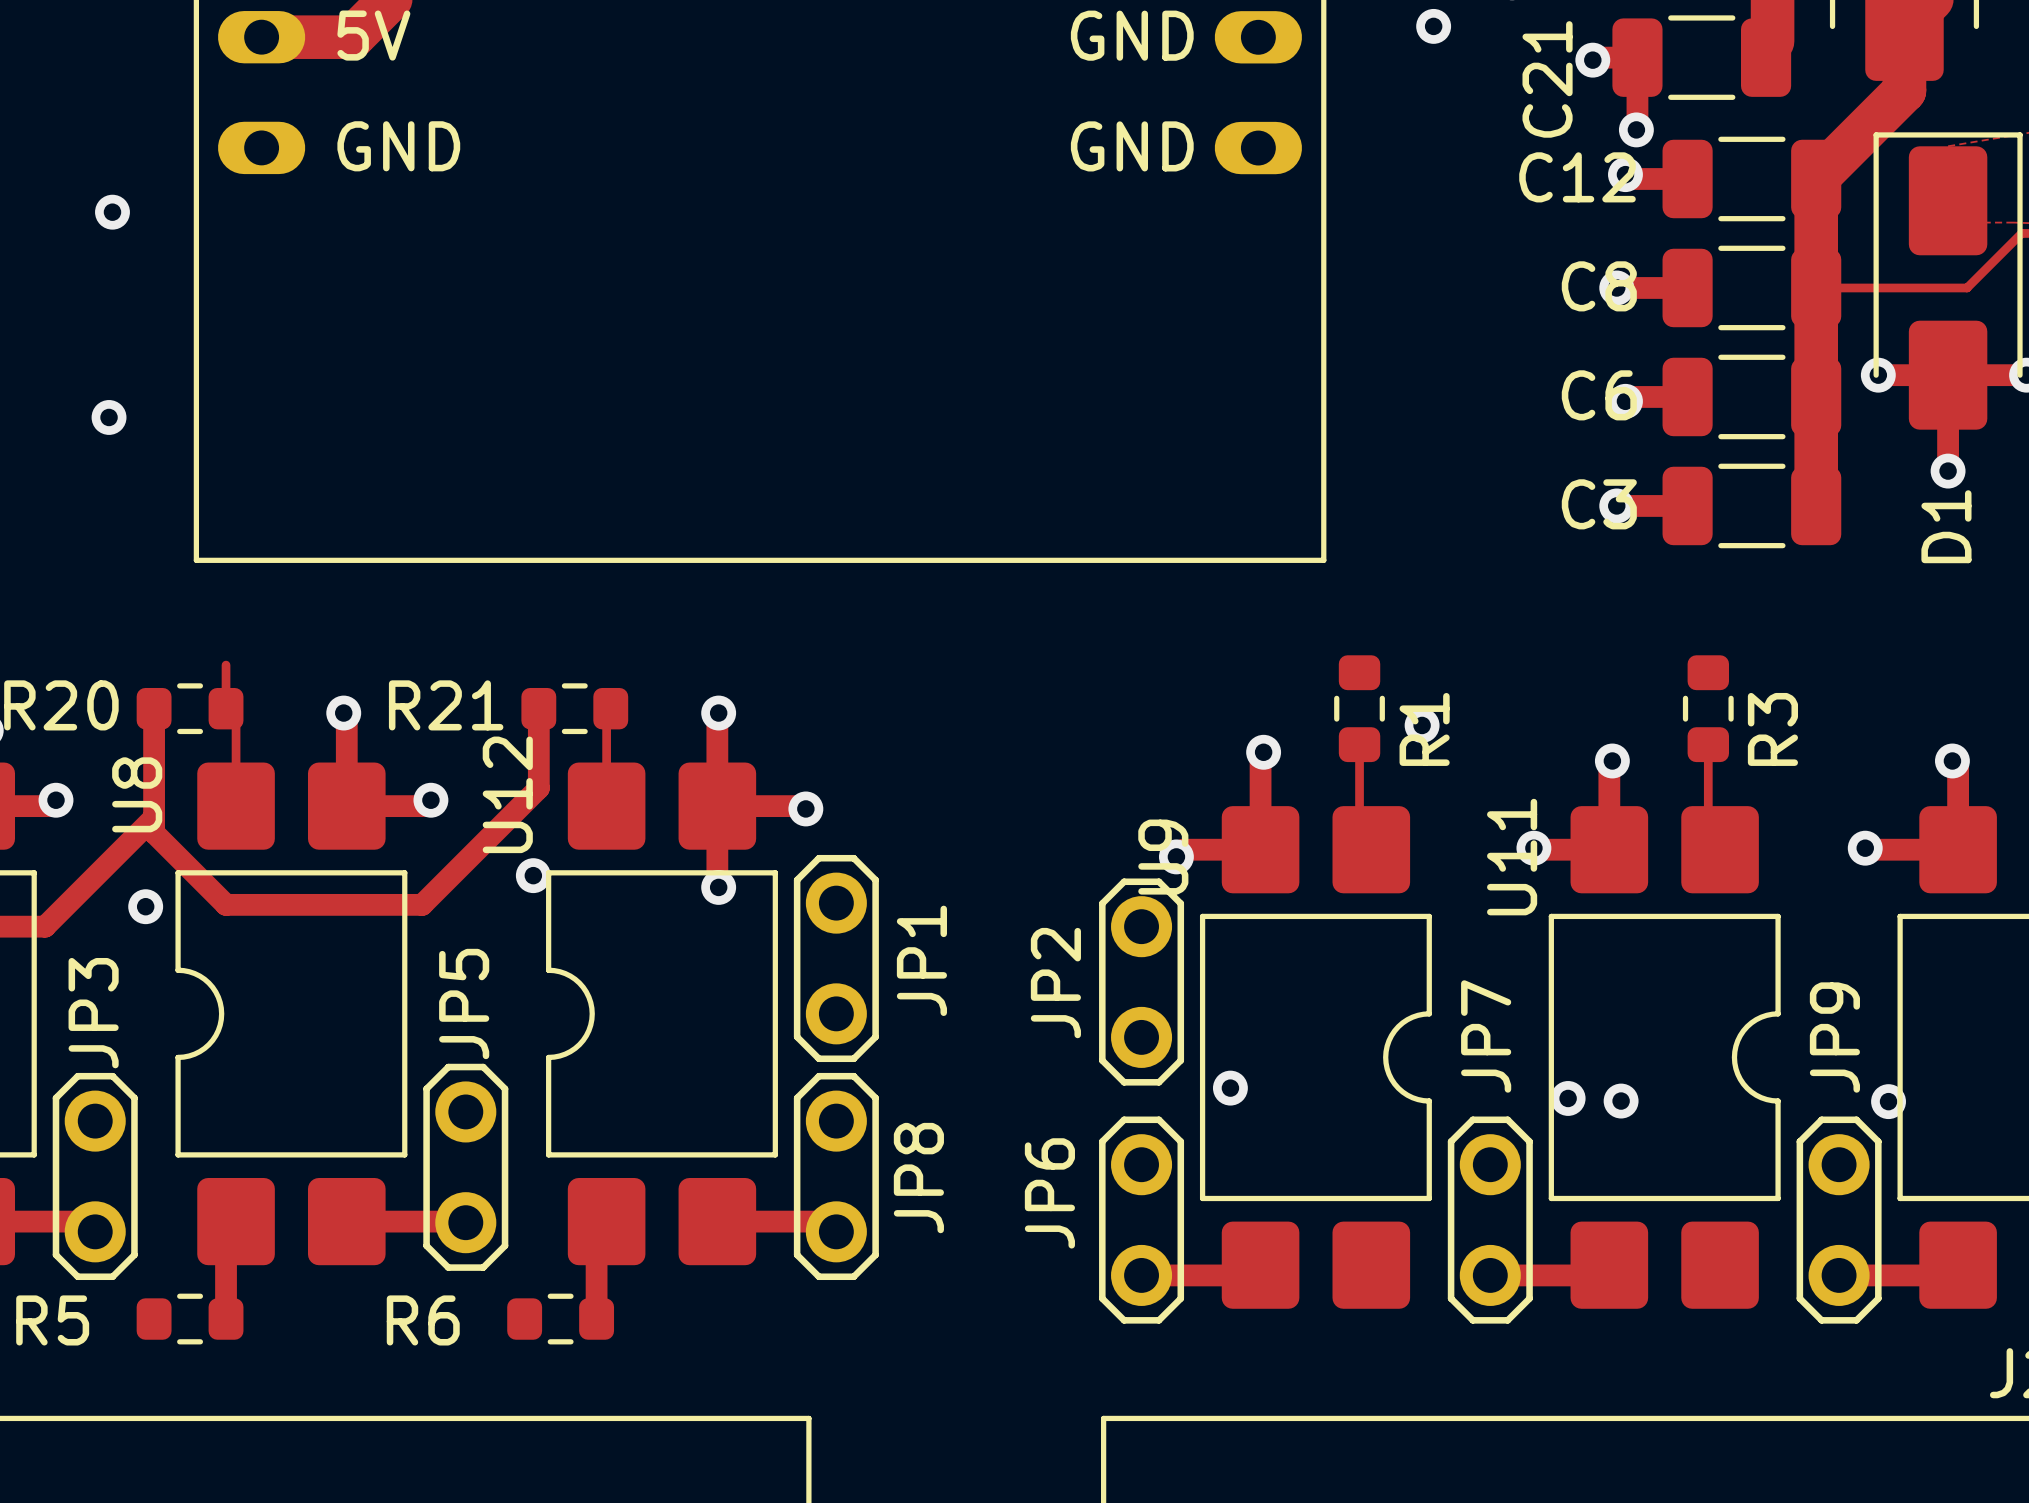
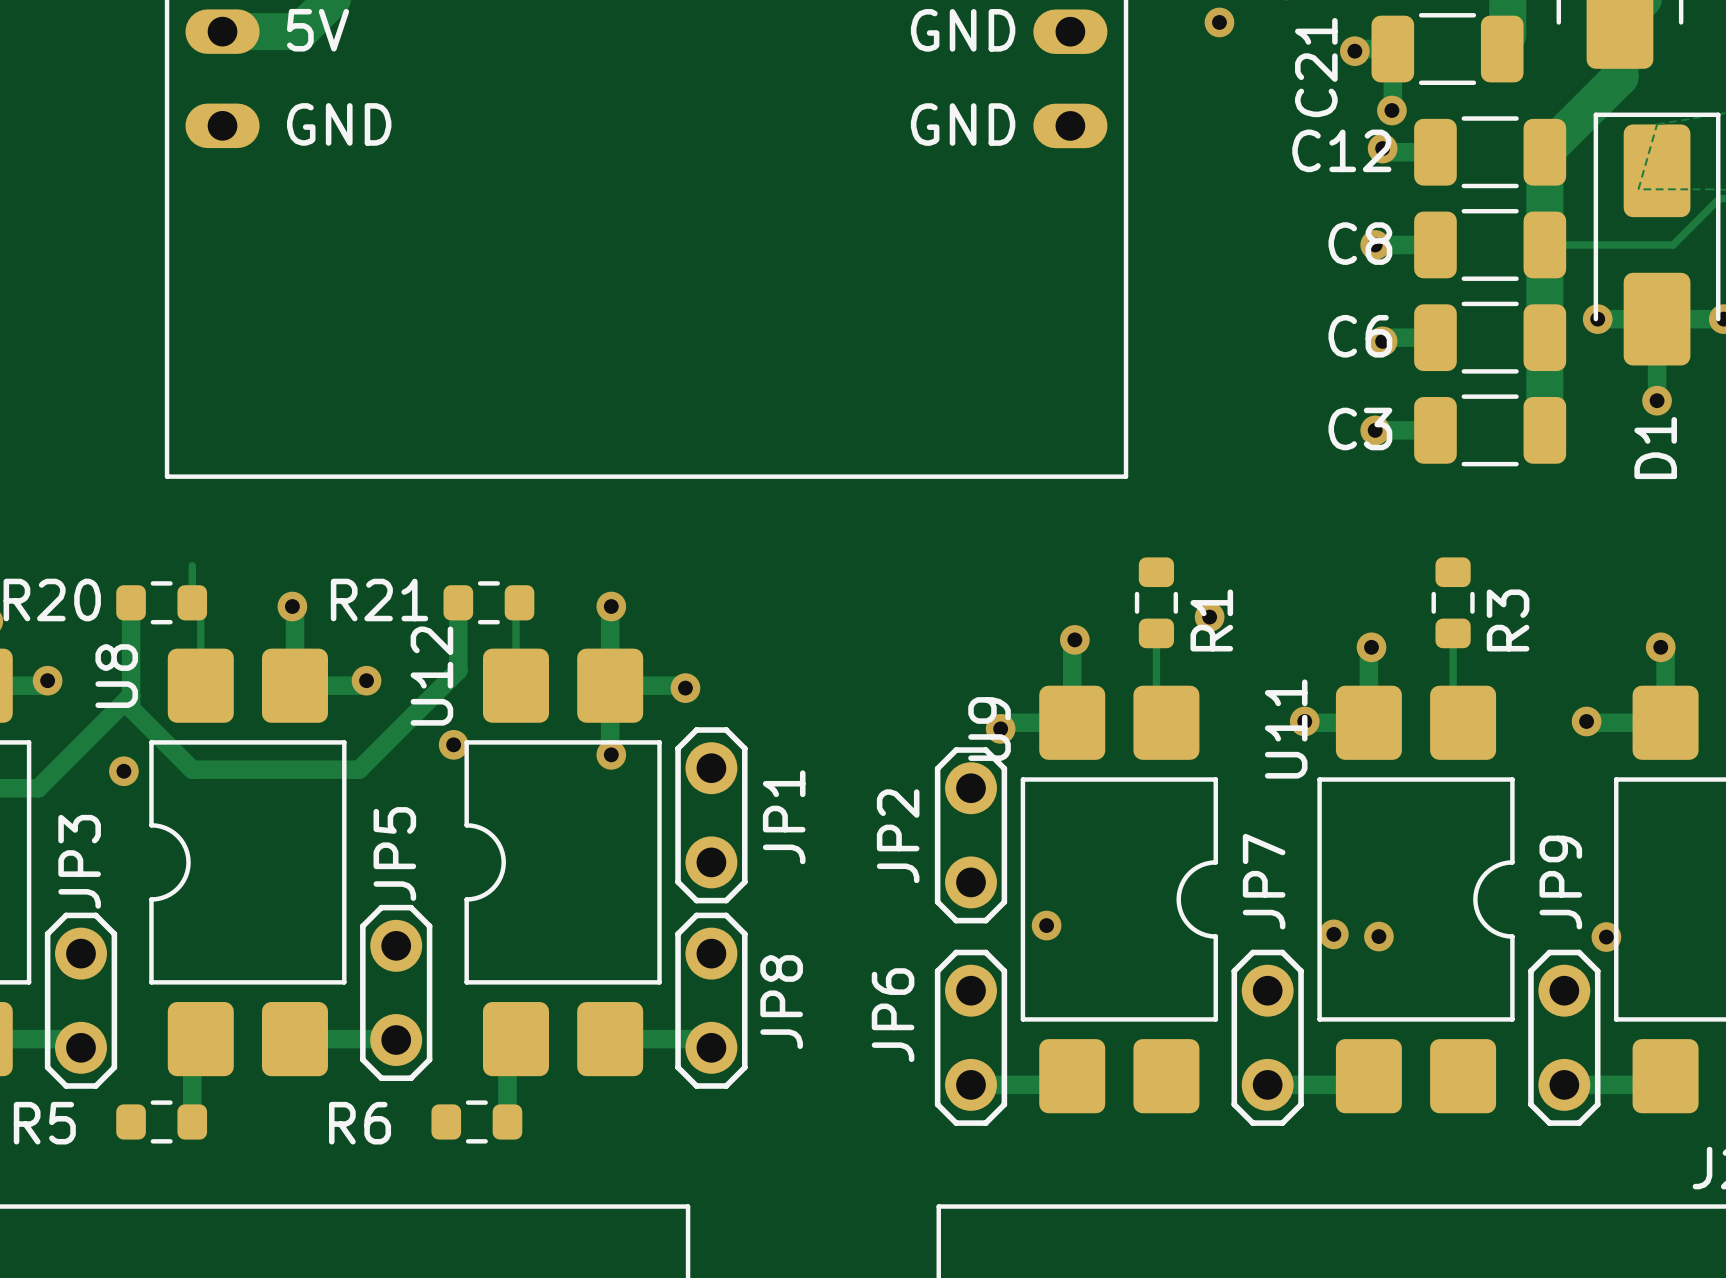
via: (112, 212) -> none
via: (109, 417) -> none

